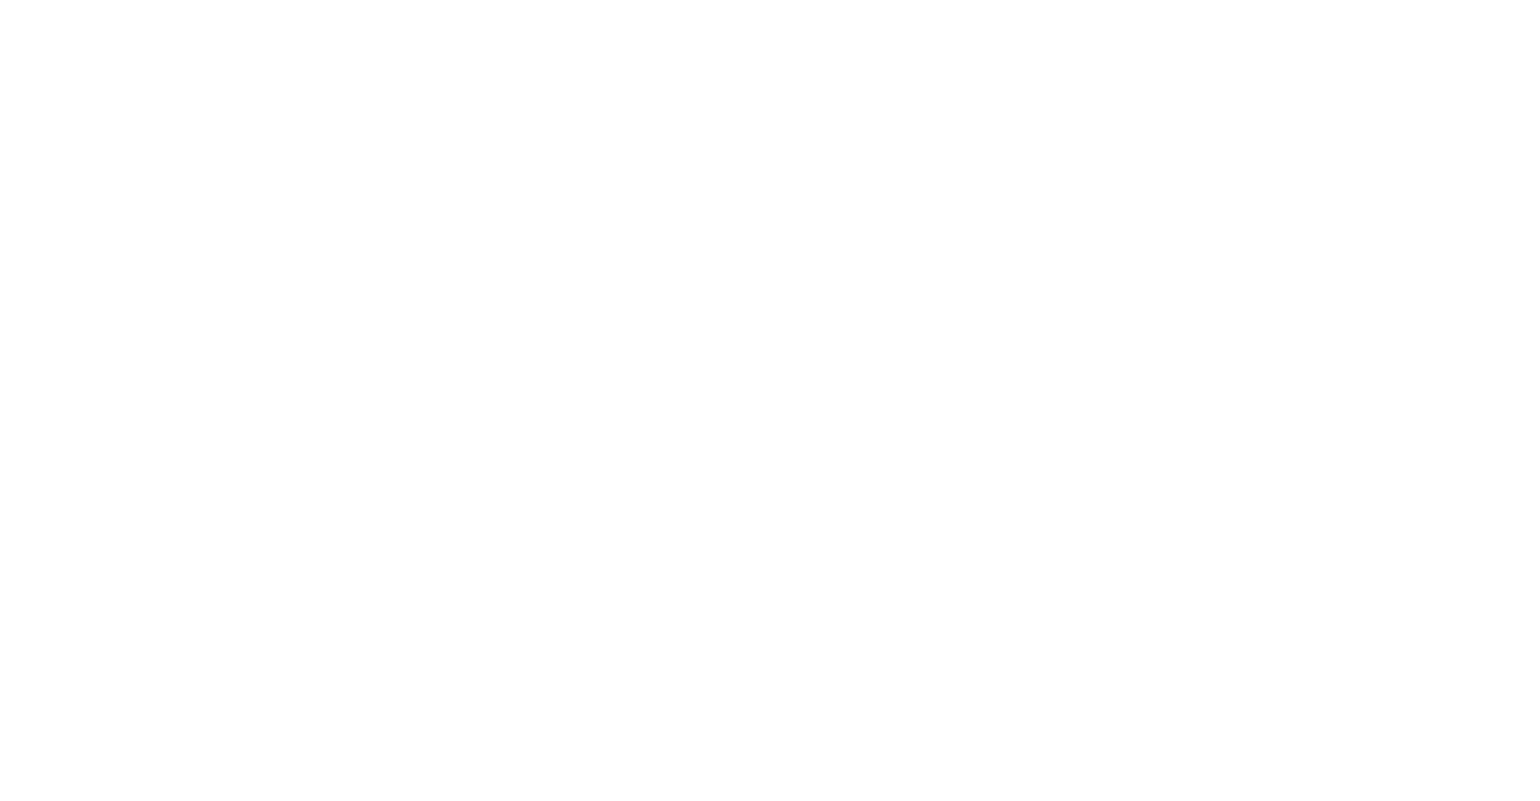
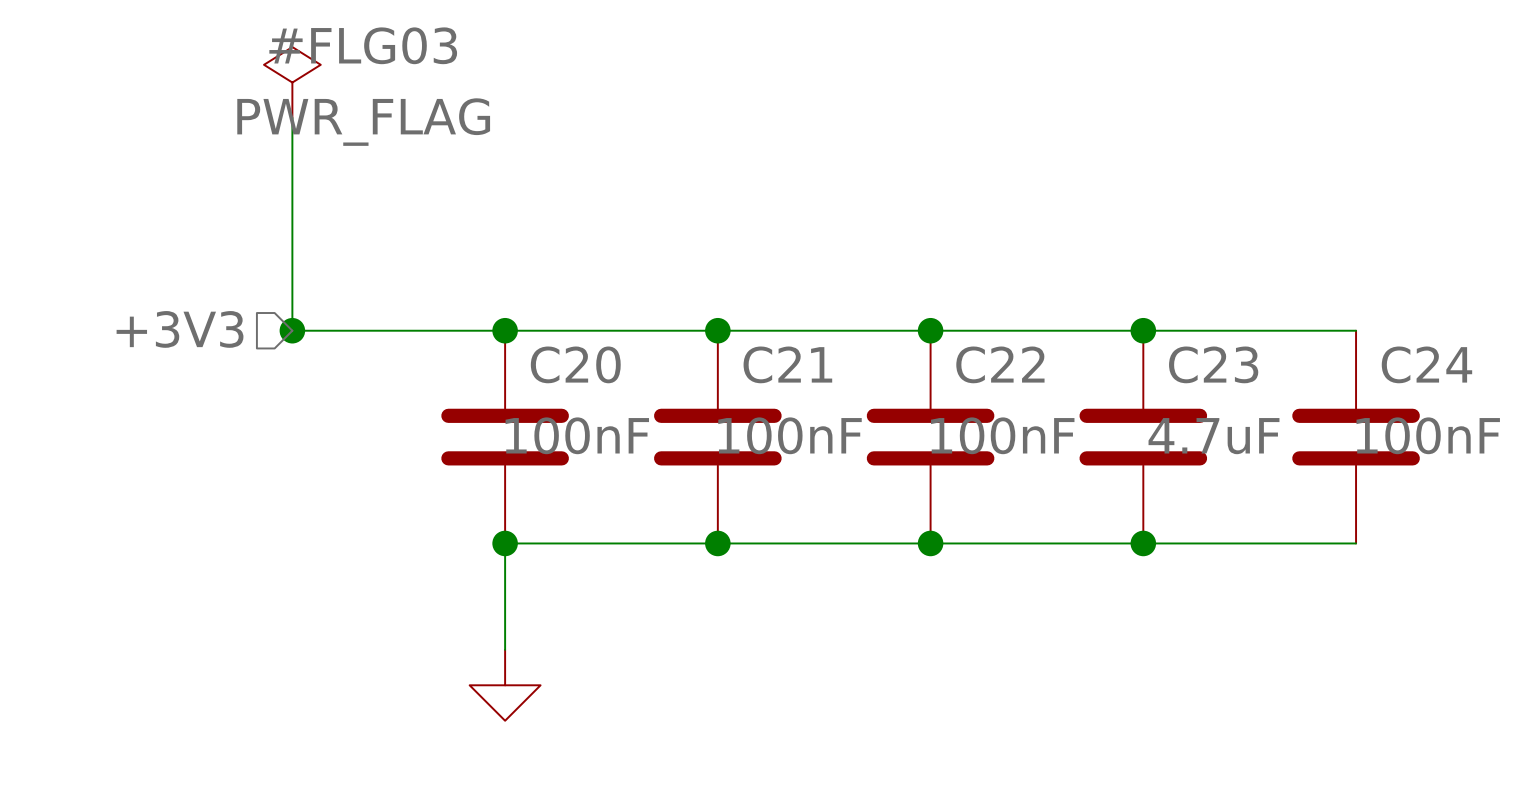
#FLG03: none -> PWR_FLAG (292, 82)
wire: none -> (292, 117) (292, 330) (1356, 330)
hierarchical label: none -> +3V3 (180, 329)
junction: none -> (292, 330)
junction: none -> (505, 330)
junction: none -> (717, 330)
junction: none -> (930, 330)
junction: none -> (1143, 330)
C20: none -> 100nF (505, 437)
C21: none -> 100nF (717, 437)
C22: none -> 100nF (930, 437)
C23: none -> 4.7uF (1143, 437)
C24: none -> 100nF (1356, 437)
junction: none -> (505, 543)
junction: none -> (717, 543)
junction: none -> (930, 543)
junction: none -> (1143, 543)
wire: none -> (1356, 543) (505, 543) (505, 649)
power symbol: none -> (505, 685)

